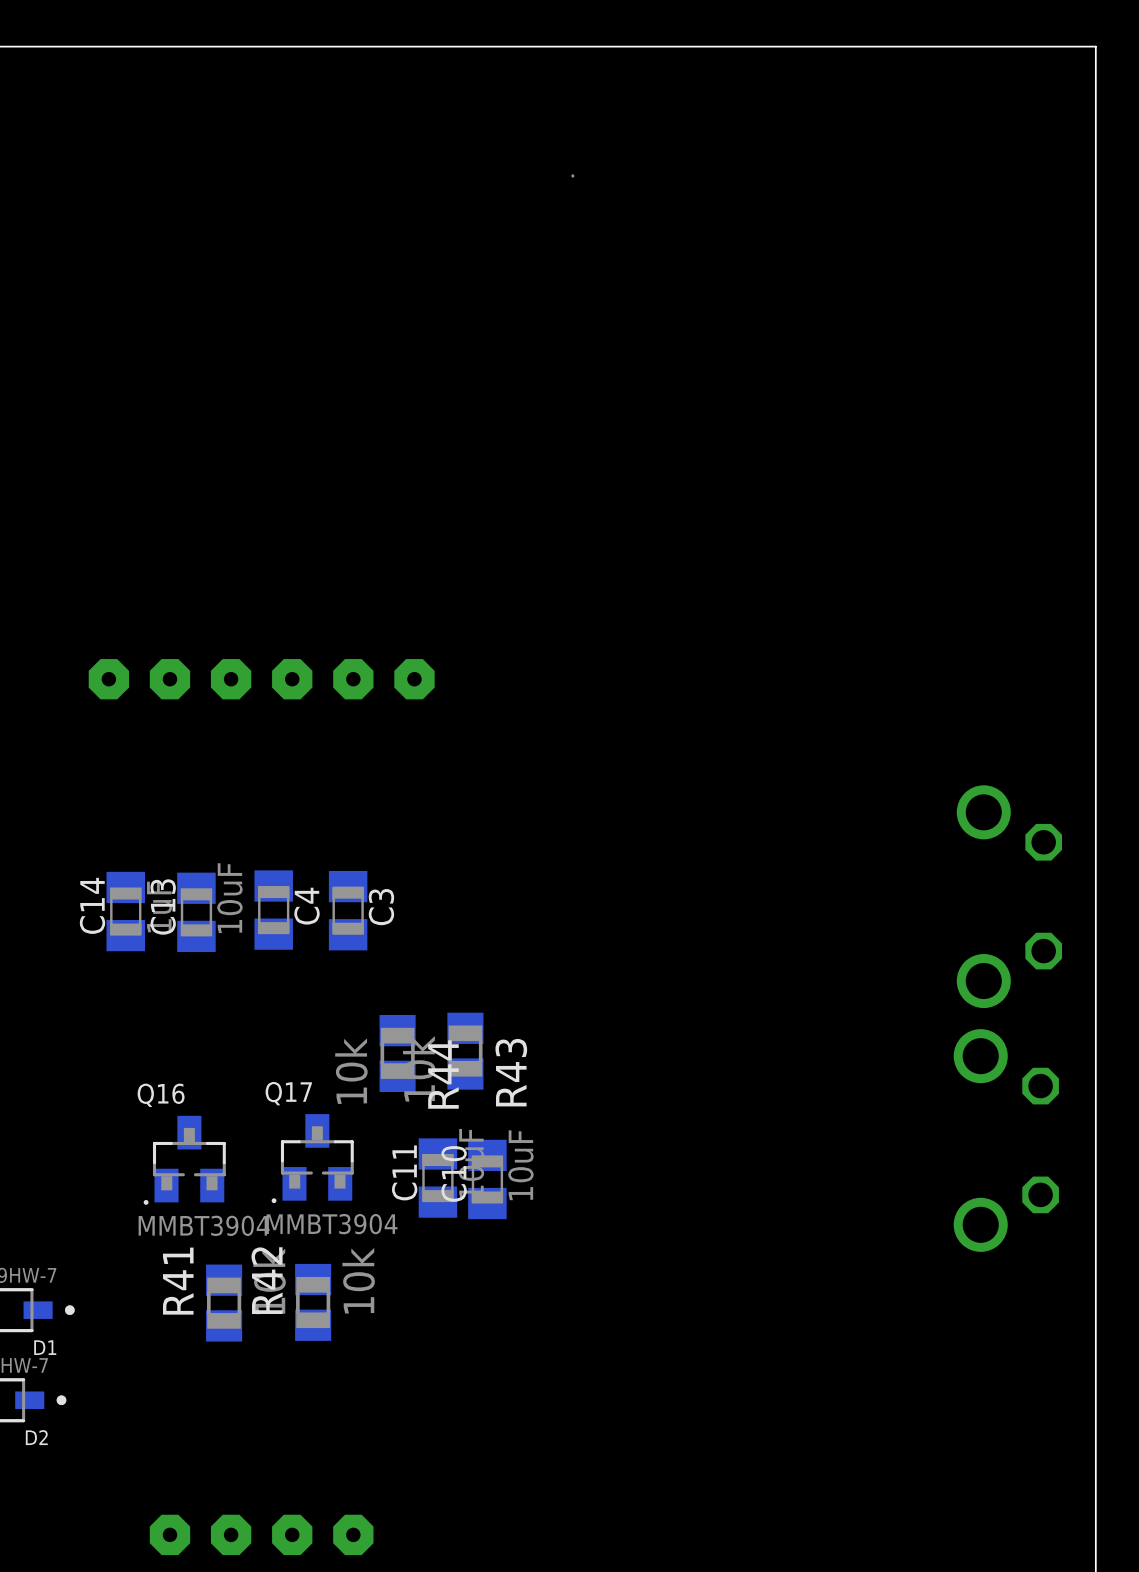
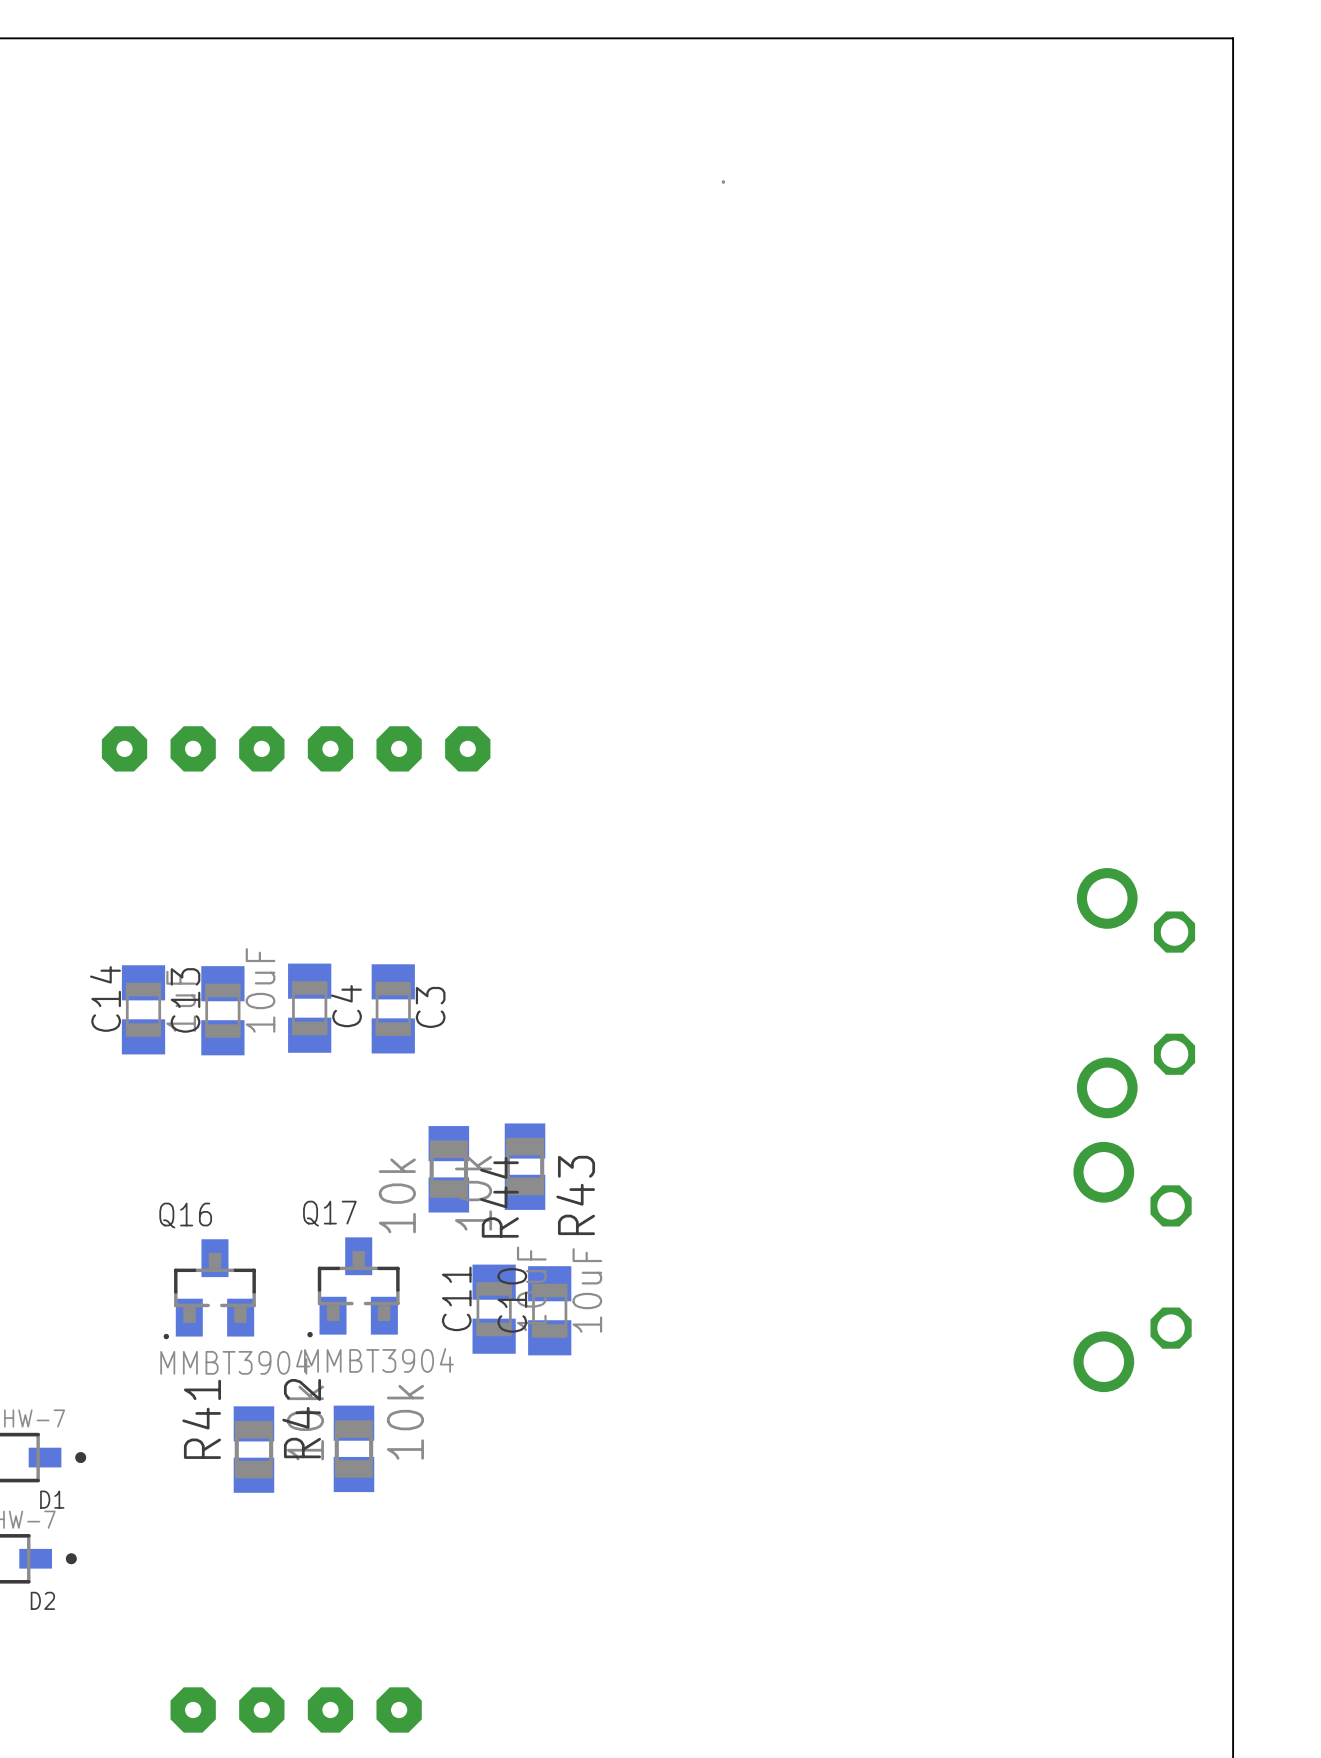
part position: (572, 175) -> (723, 182)

